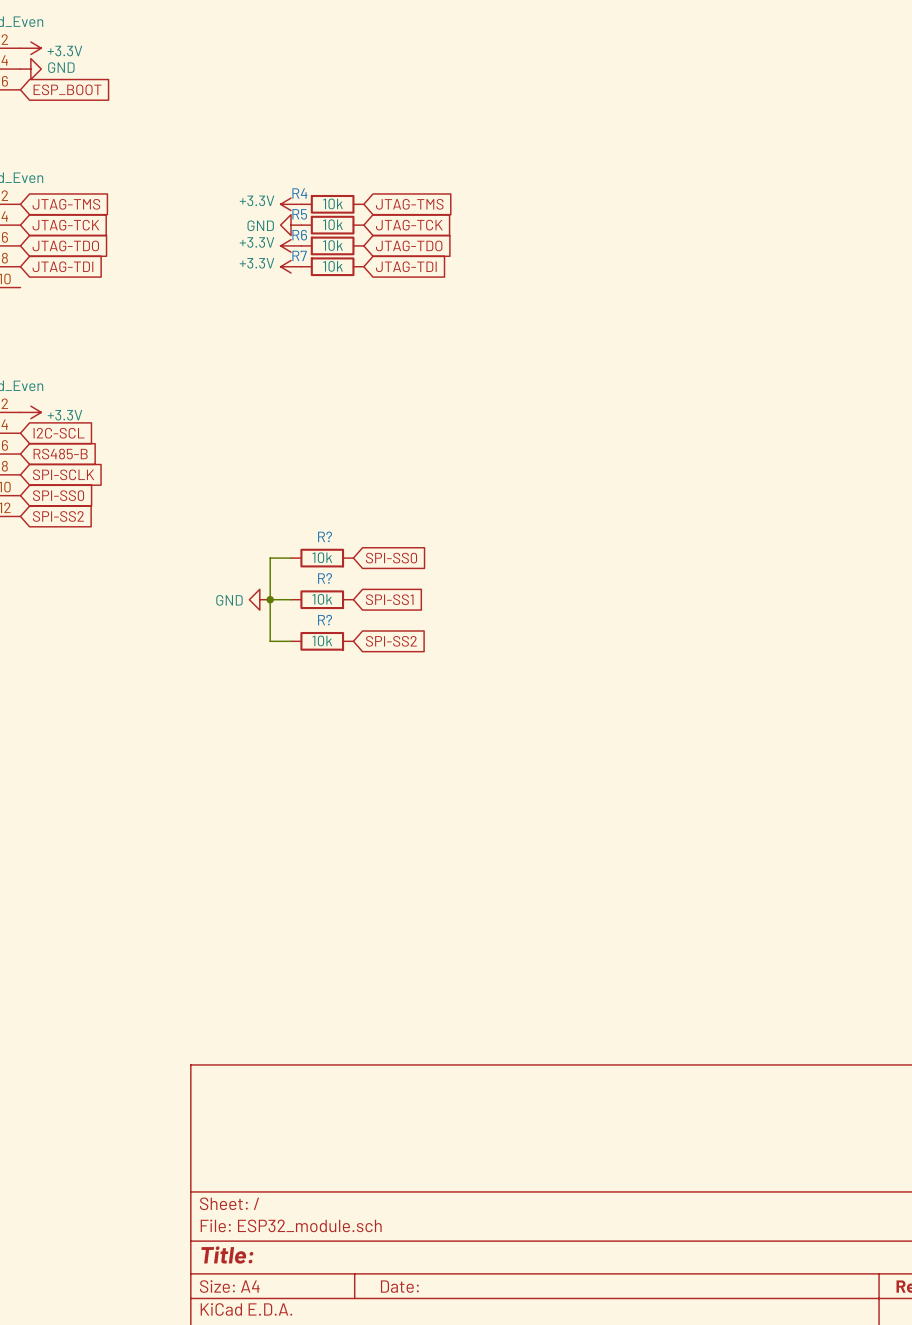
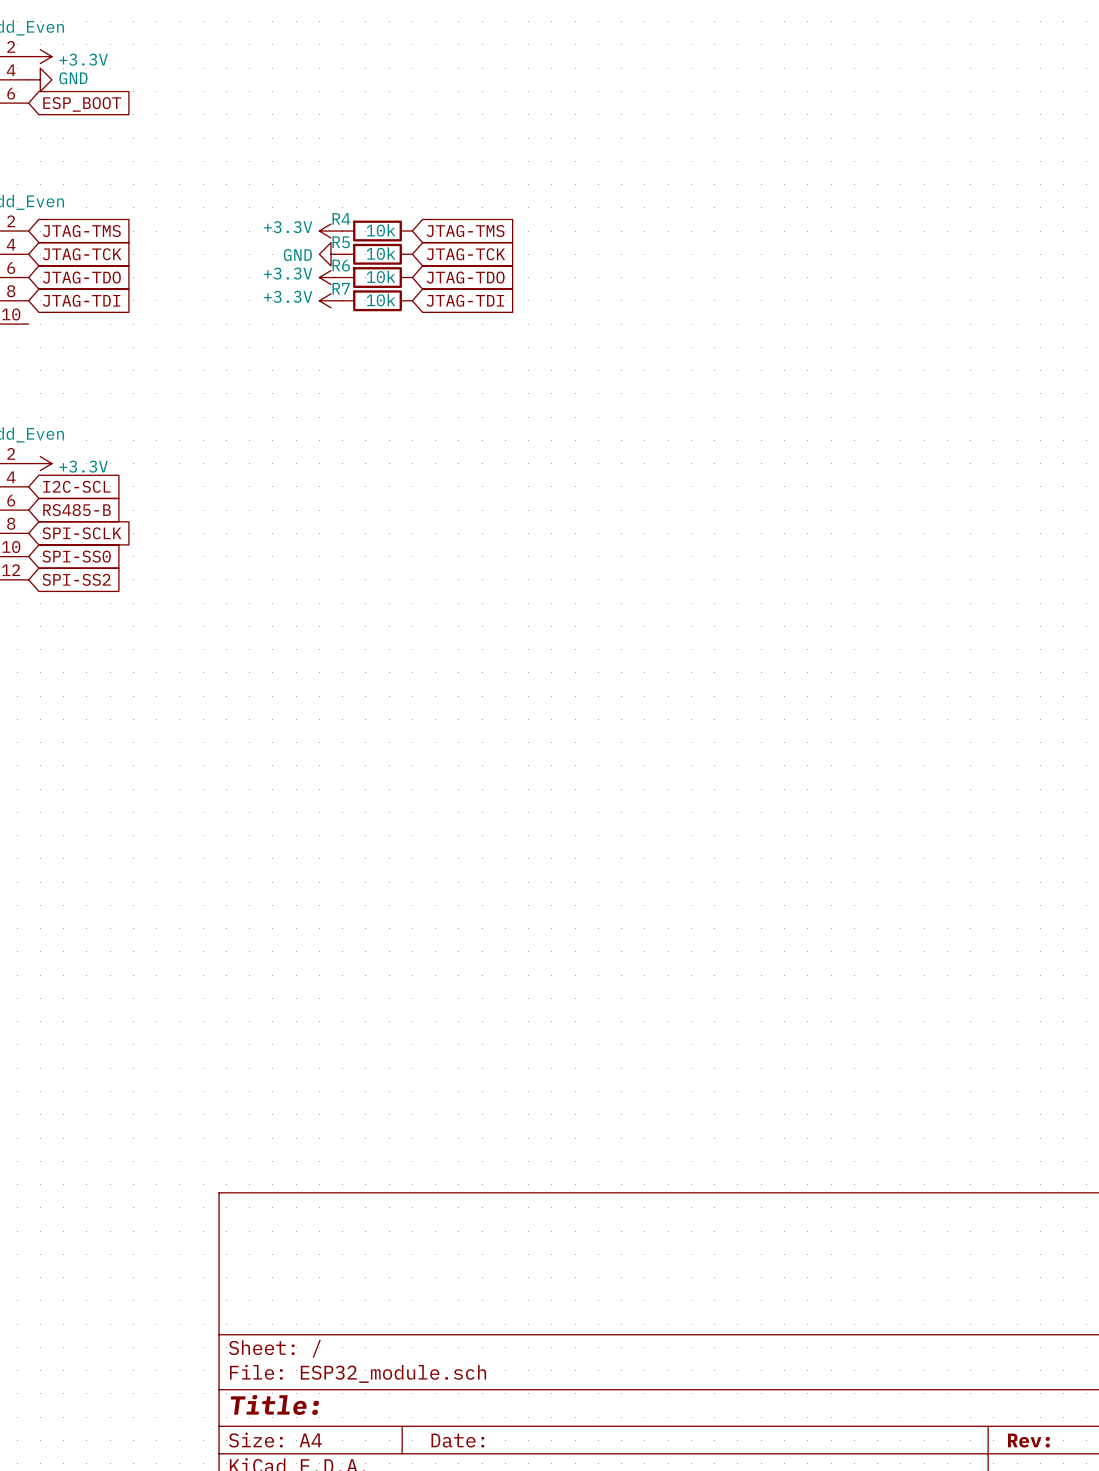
wire: (291, 558) (270, 558) (270, 641) (291, 641) -> none
R?: 10k (322, 558) -> none
global label: SPI-SS0 (391, 558) -> none
power symbol: GND (259, 599) -> none
wire: (270, 599) (291, 599) -> none
junction: (270, 599) -> none
R?: 10k (322, 599) -> none
global label: SPI-SS1 (389, 599) -> none
R?: 10k (322, 641) -> none
global label: SPI-SS2 (391, 641) -> none

